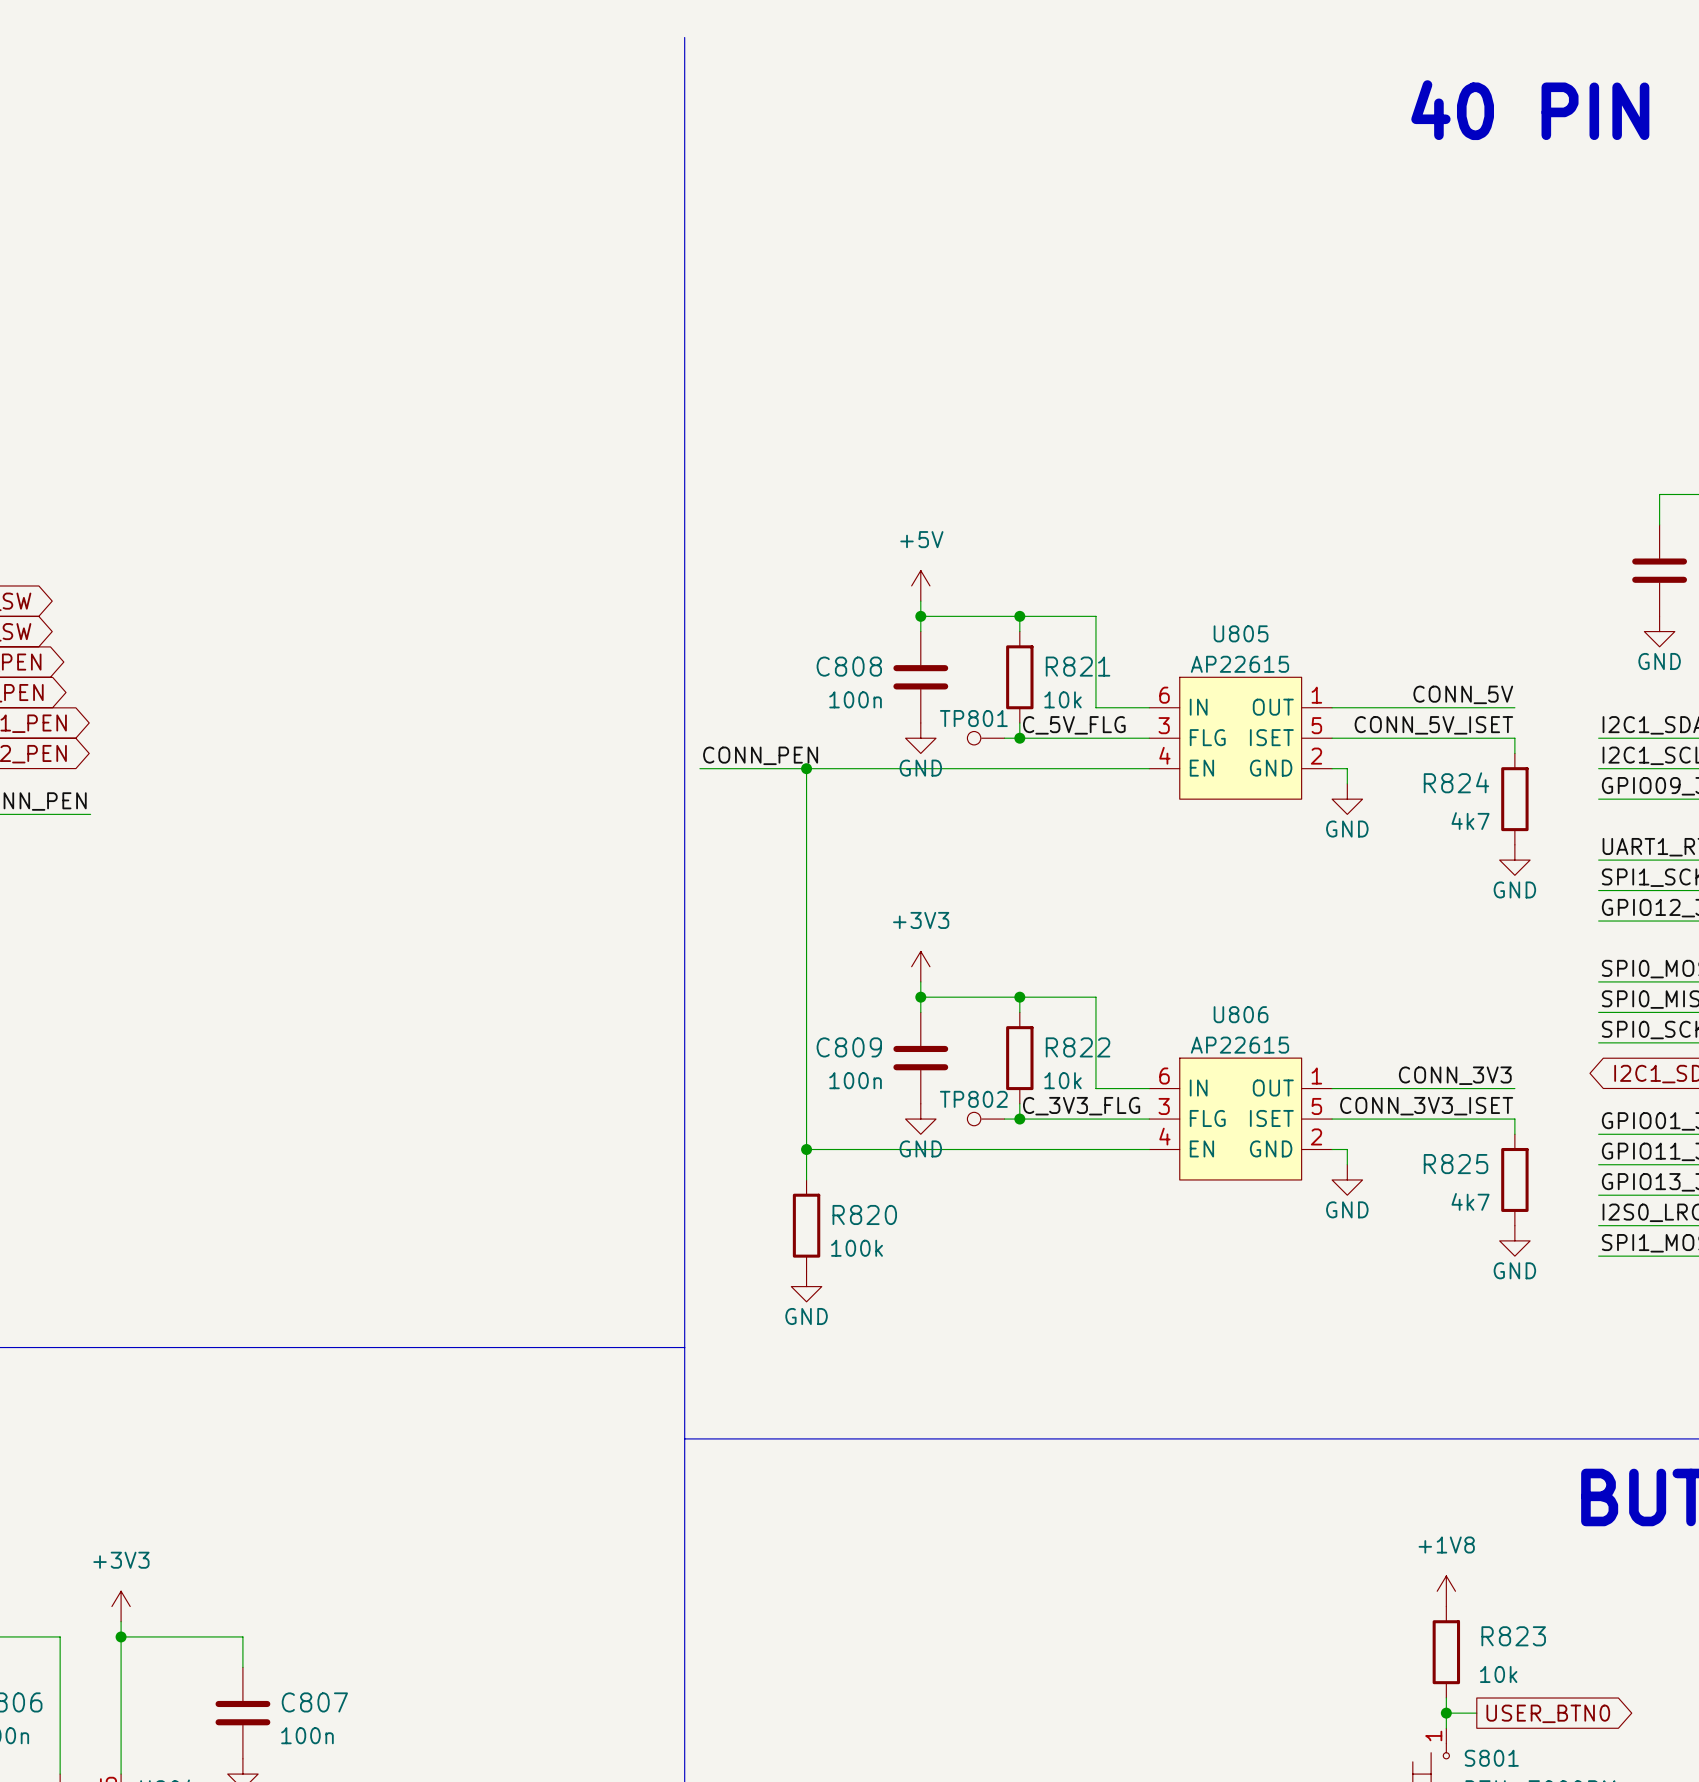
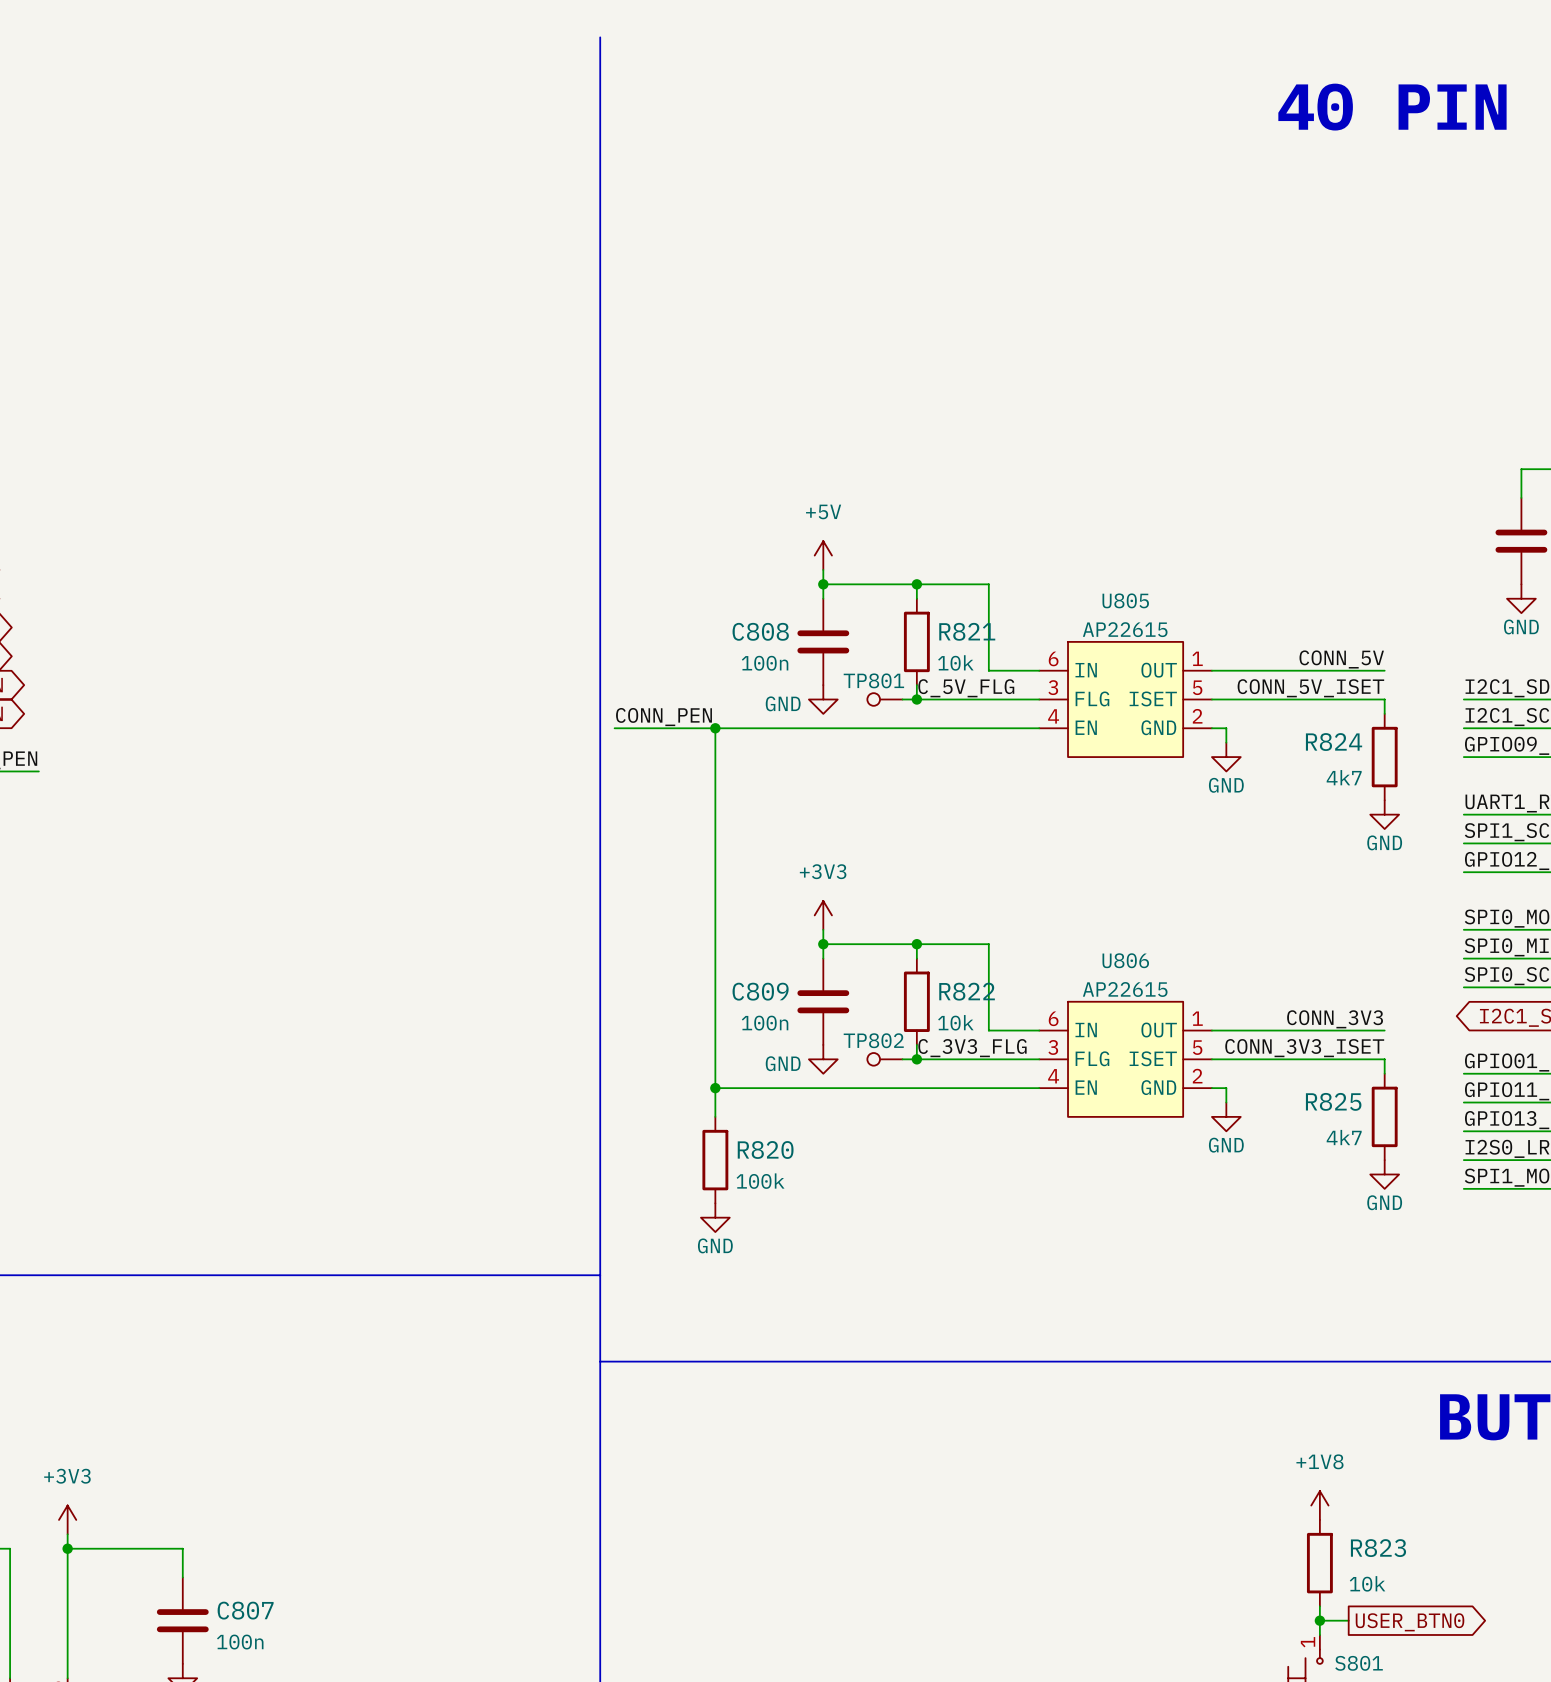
power symbol text position: GND (920, 768) -> GND (783, 703)
power symbol text position: GND (920, 1148) -> GND (783, 1063)

